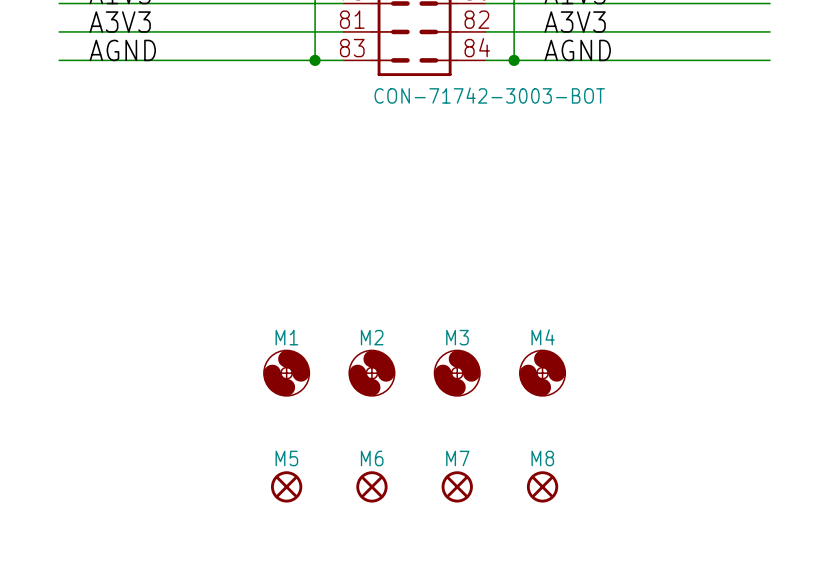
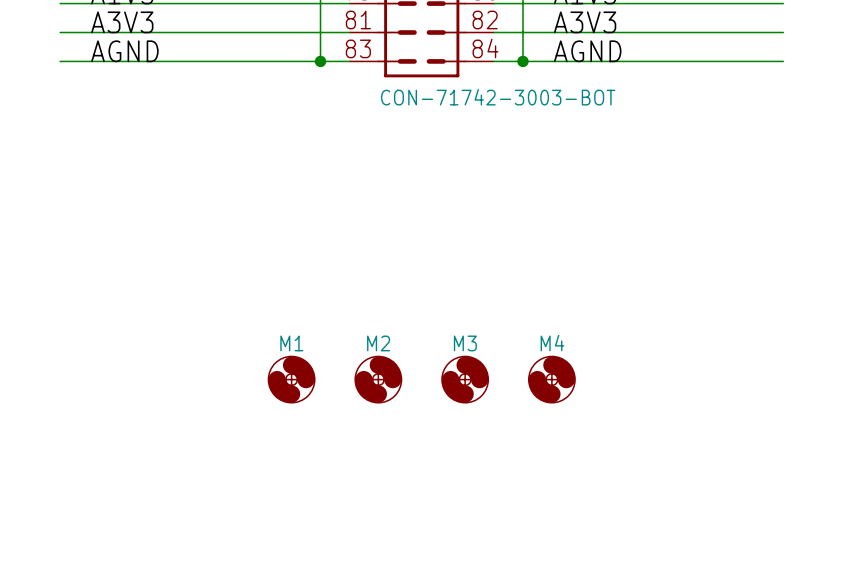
M5: (286, 486) -> none
M6: (371, 486) -> none
M7: (457, 486) -> none
M8: (542, 486) -> none

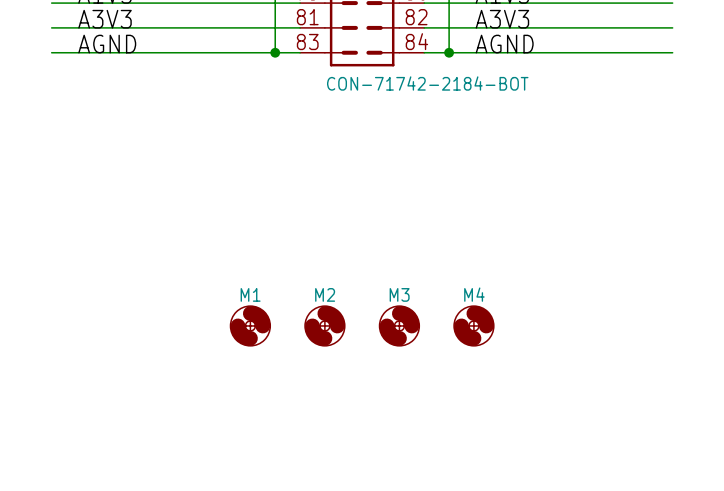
part value: CON-71742-3003-BOT (498, 97) -> CON-71742-2184-BOT (427, 83)

